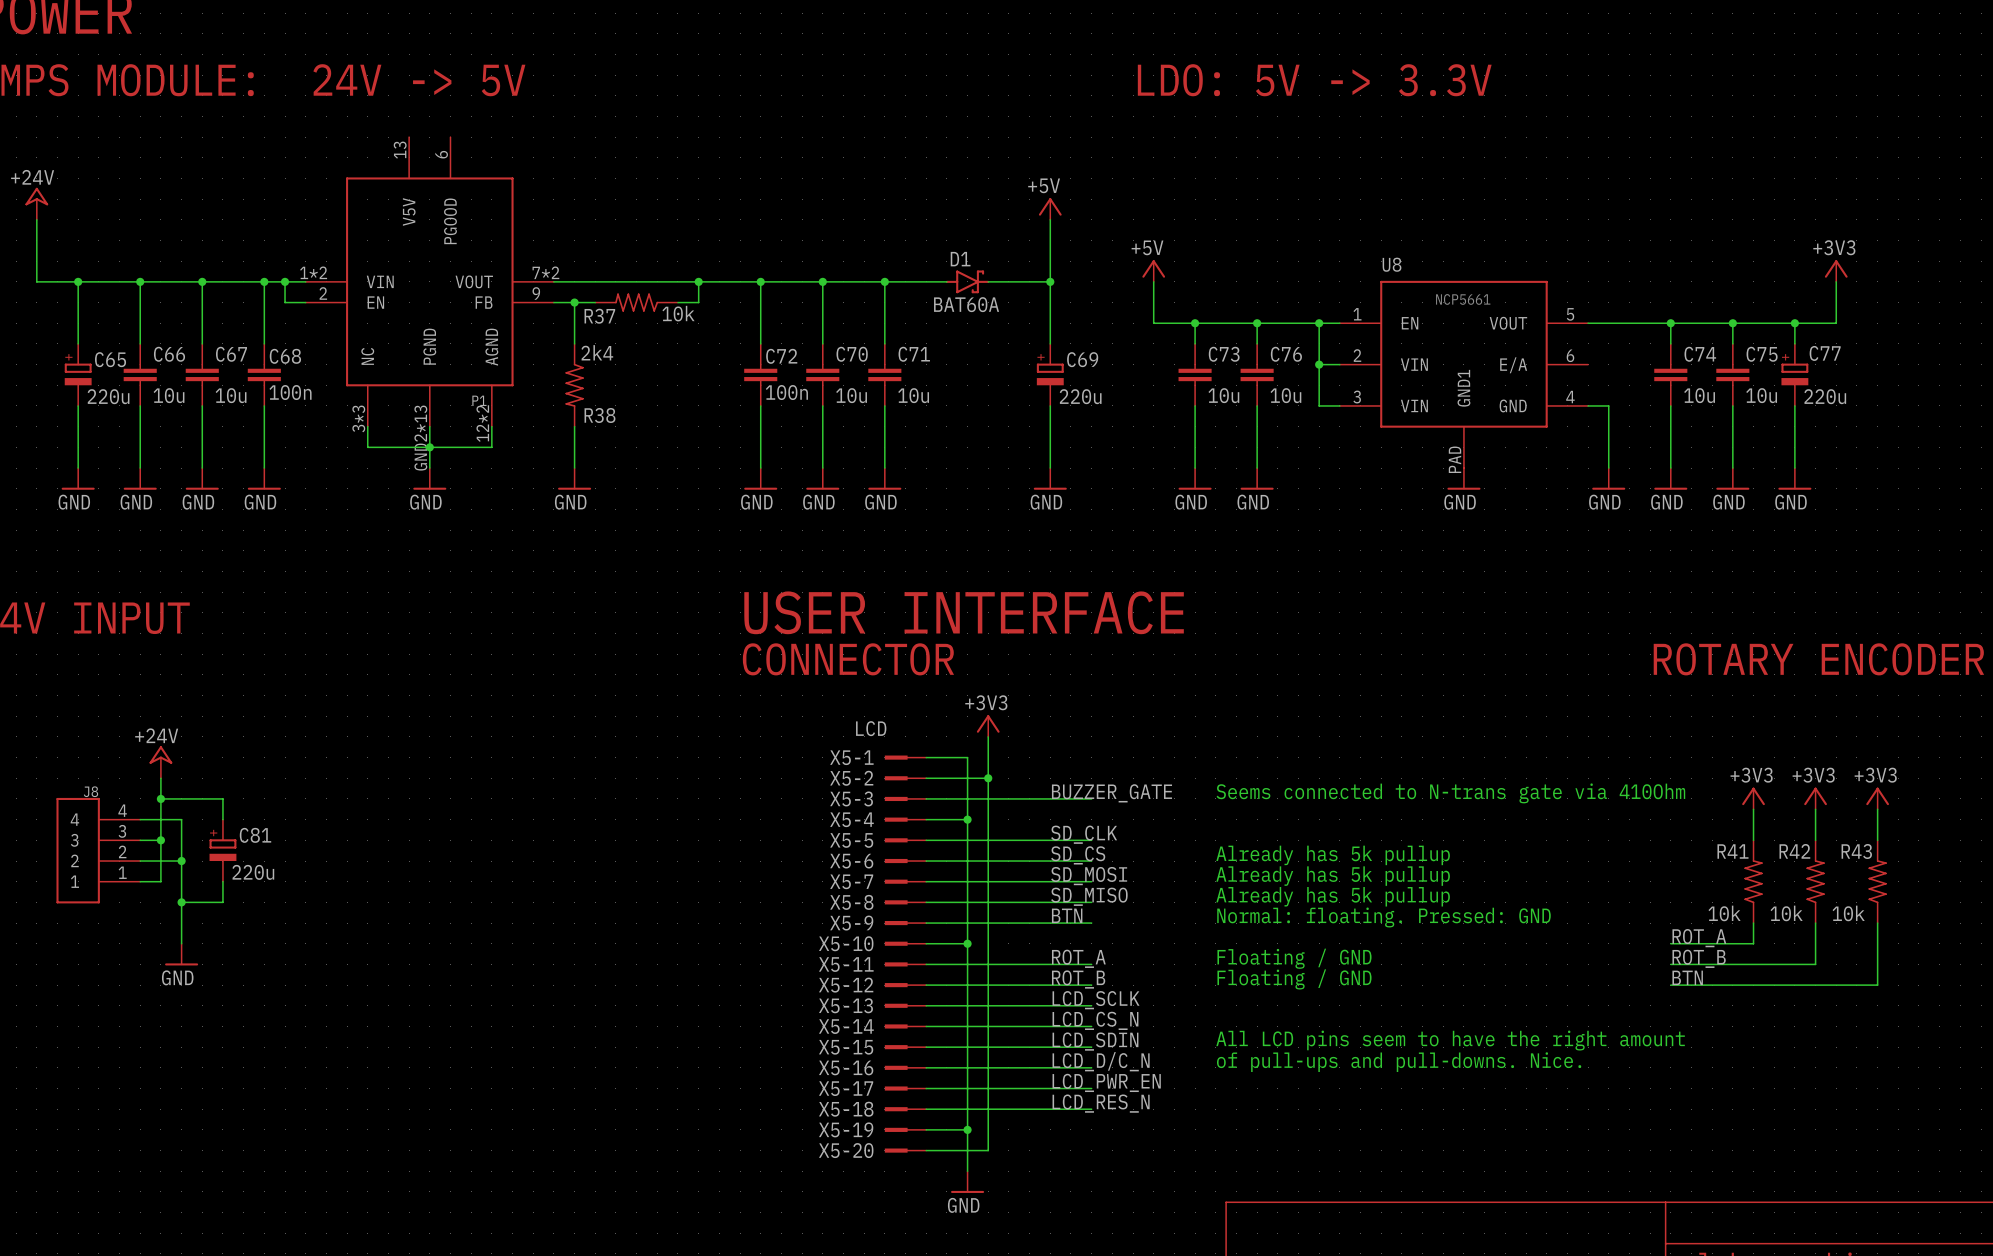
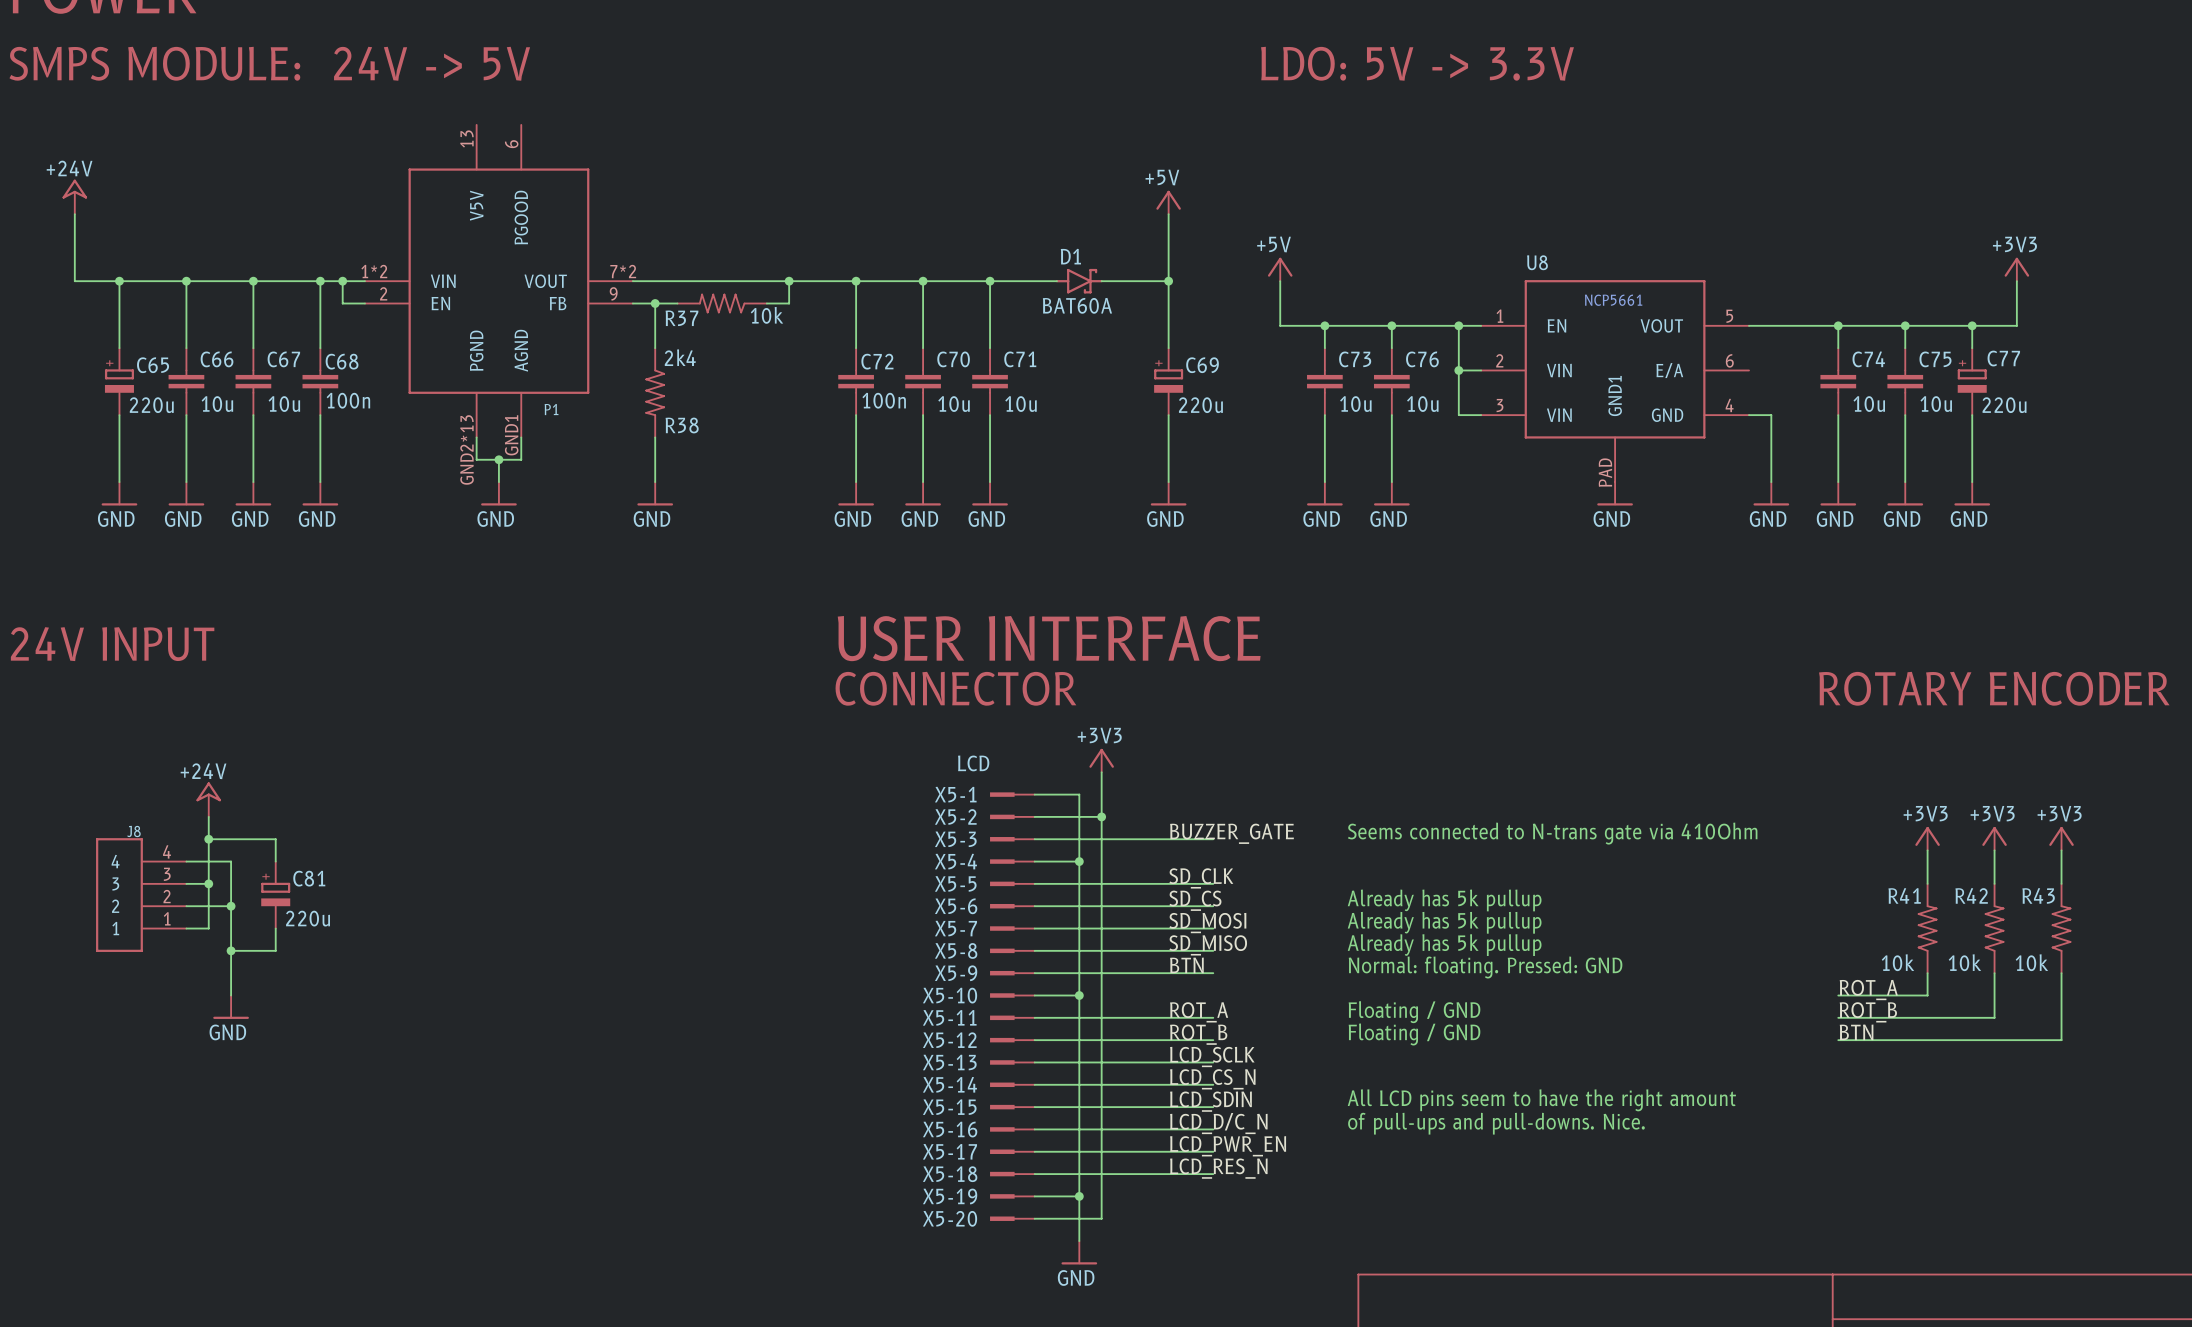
P1 symbol: [305, 137, 554, 427] -> [365, 124, 633, 438]
wire: (367, 426) (367, 447) (409, 447) -> (476, 437) (476, 459)
wire: (429, 426) (429, 447) -> none
wire: (491, 426) (491, 447) (450, 447) -> (521, 437) (521, 459)

